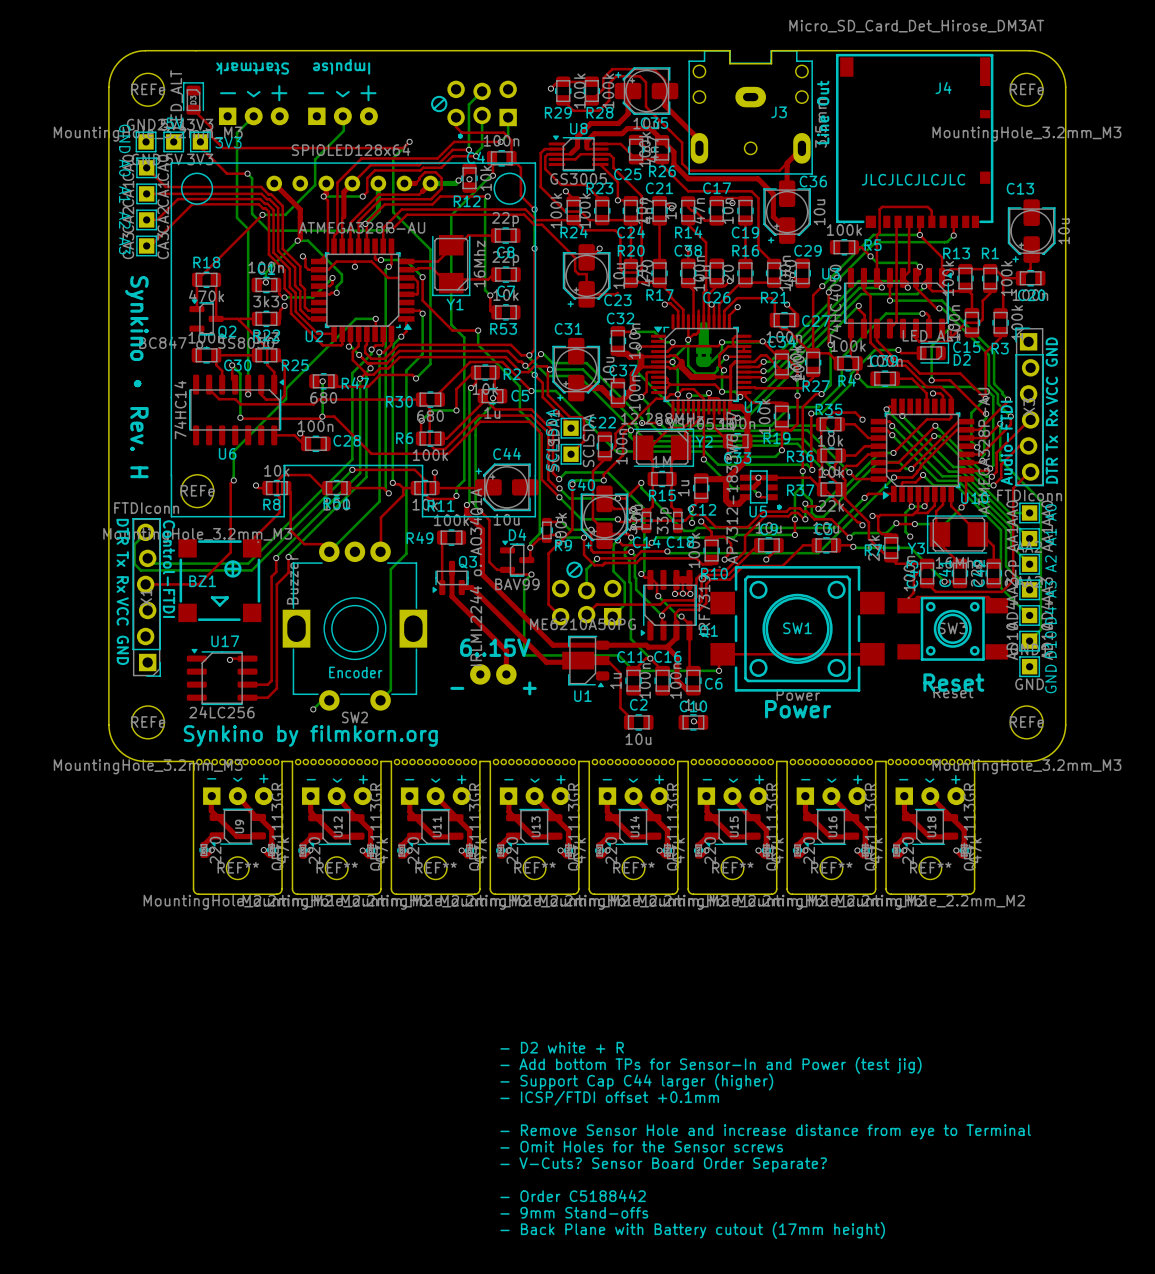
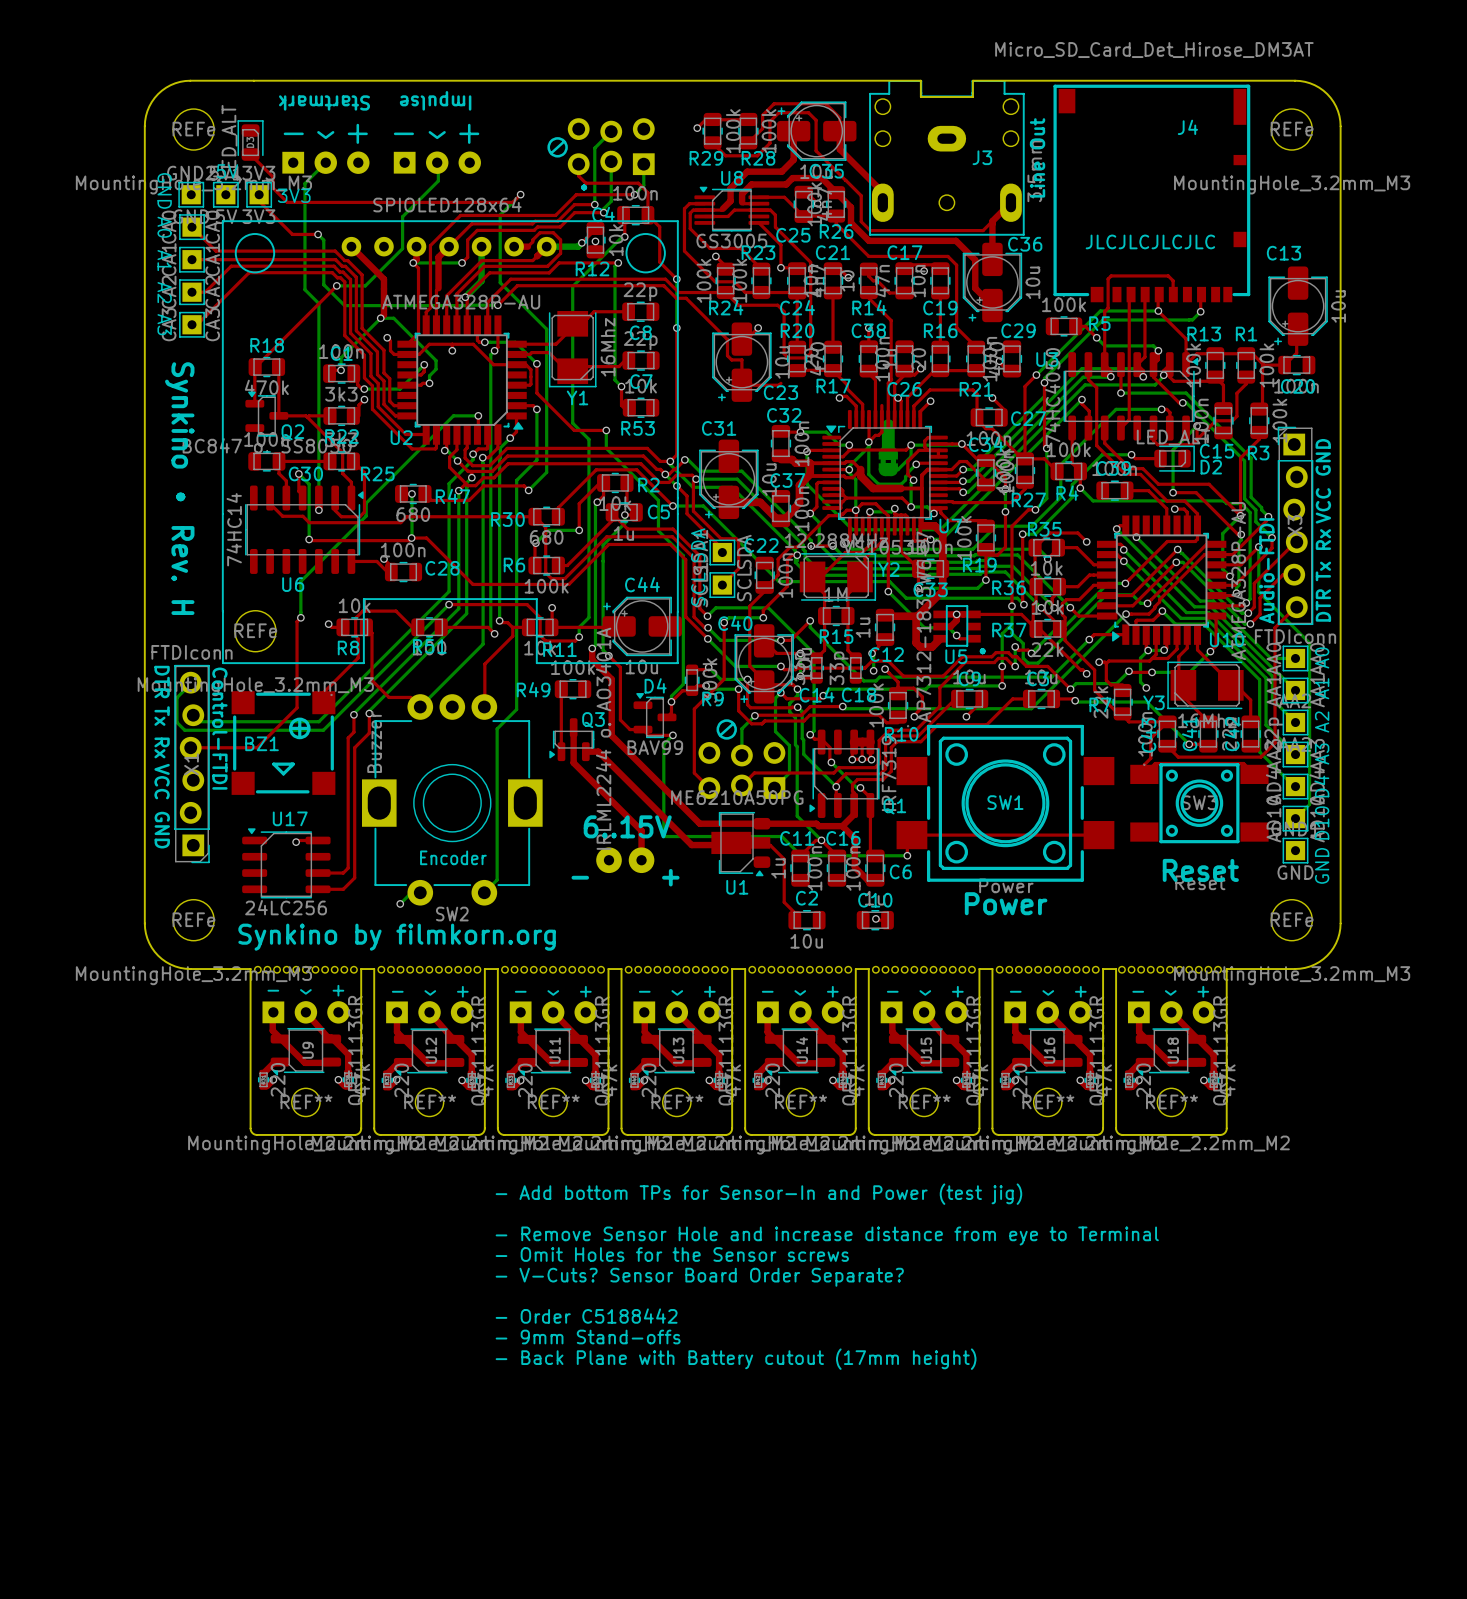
text: - D2 white + R (562, 1047) -> none
text position: - Add bottom TPs for Sensor-In and Power (test jig) (710, 1065) -> - Add bottom TPs for Sensor-In and Power (test jig) (758, 1194)
text: - Support Cap C44 larger (higher) (636, 1081) -> none
text: - ICSP/FTDI offset +0.1mm (609, 1098) -> none
text position: - Remove Sensor Hole and increase distance from eye to Terminal (765, 1131) -> - Remove Sensor Hole and increase distance from eye to Terminal (827, 1236)
text position: - Omit Holes for the Sensor screws (641, 1146) -> - Omit Holes for the Sensor screws (672, 1254)
text position: - V-Cuts? Sensor Board Order Separate? (663, 1164) -> - V-Cuts? Sensor Board Order Separate? (699, 1277)
text position: - Order C5188442 (573, 1195) -> - Order C5188442 (586, 1316)
text position: - 9mm Stand-offs (574, 1212) -> - 9mm Stand-offs (588, 1337)
text position: - Back Plane with Battery cutout (17mm height) (692, 1230) -> - Back Plane with Battery cutout (17mm height) (736, 1359)

